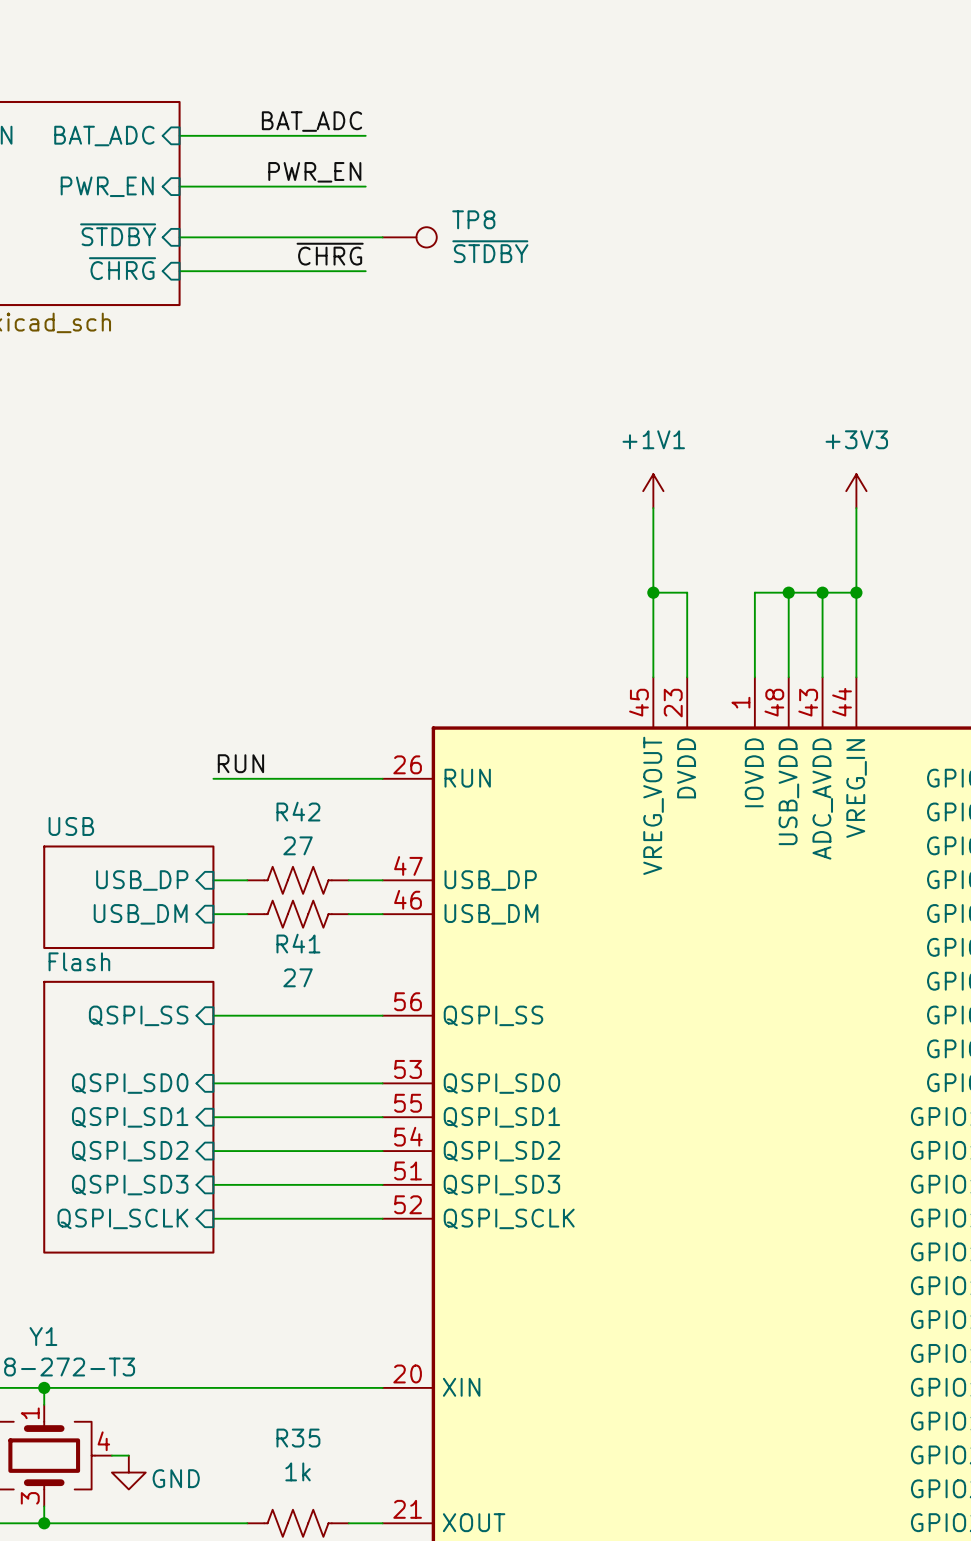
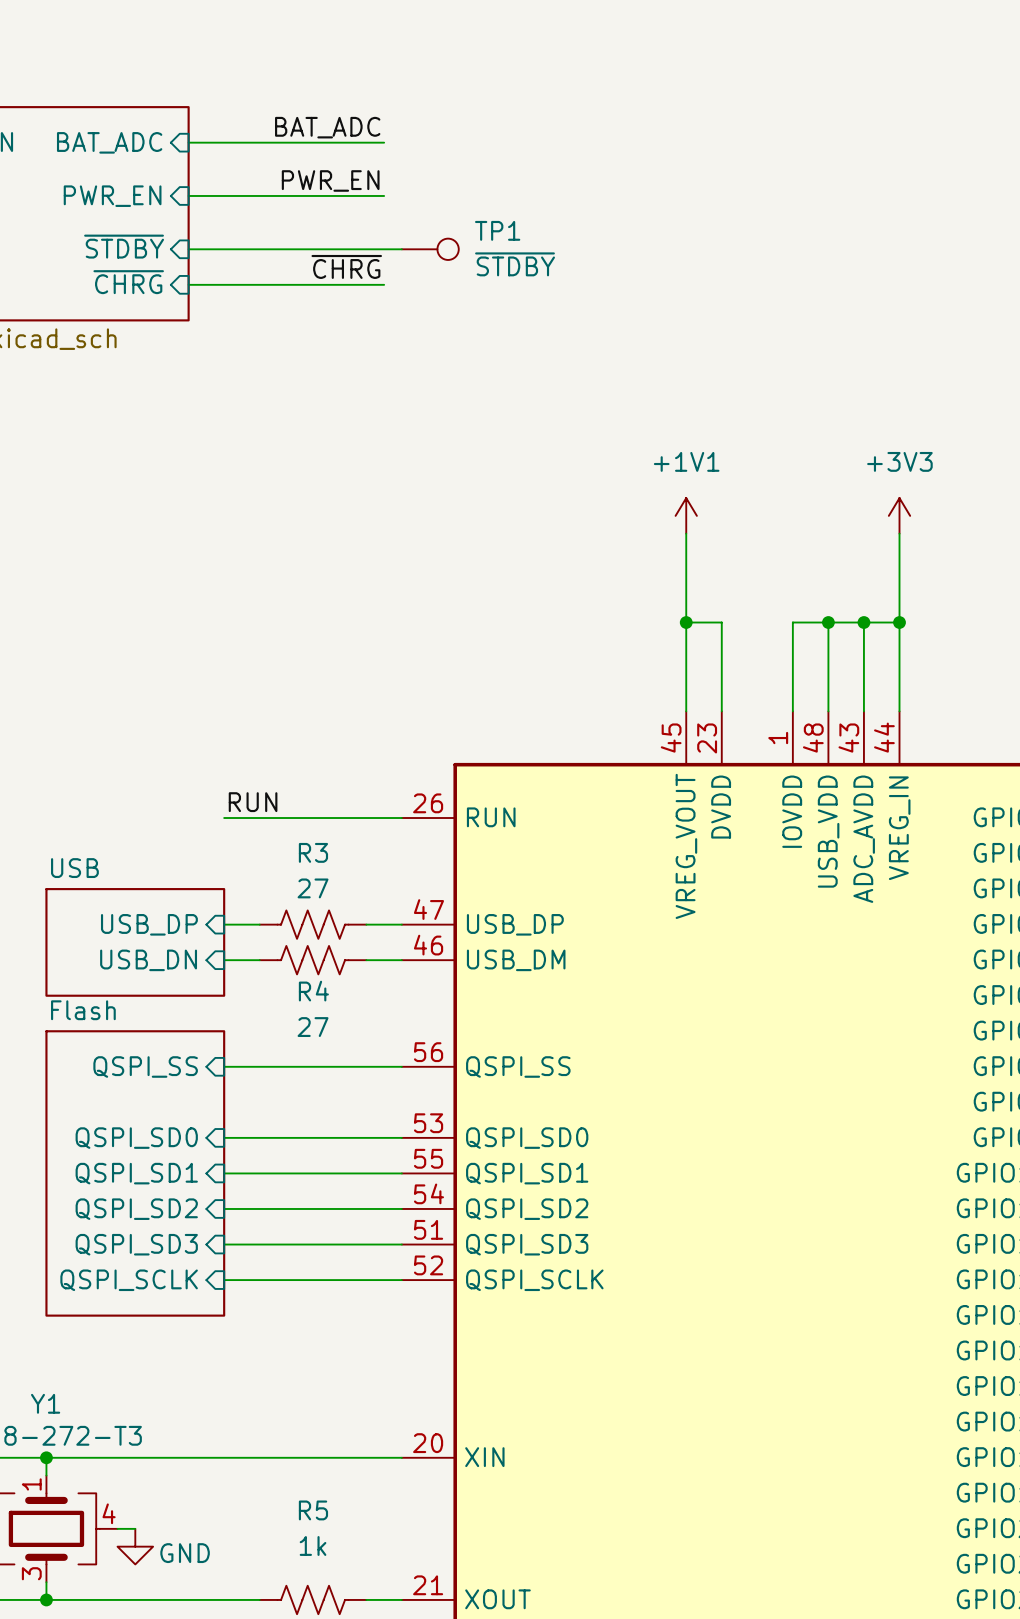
TP8 name: TP8 (473, 219) -> TP1 (497, 230)
R42 name: R42 (298, 811) -> R3 (313, 852)
sheet pin: USB_DM (140, 914) -> USB_DN (148, 960)
R41 name: R41 (298, 943) -> R4 (313, 991)
R35 name: R35 (298, 1438) -> R5 (313, 1510)

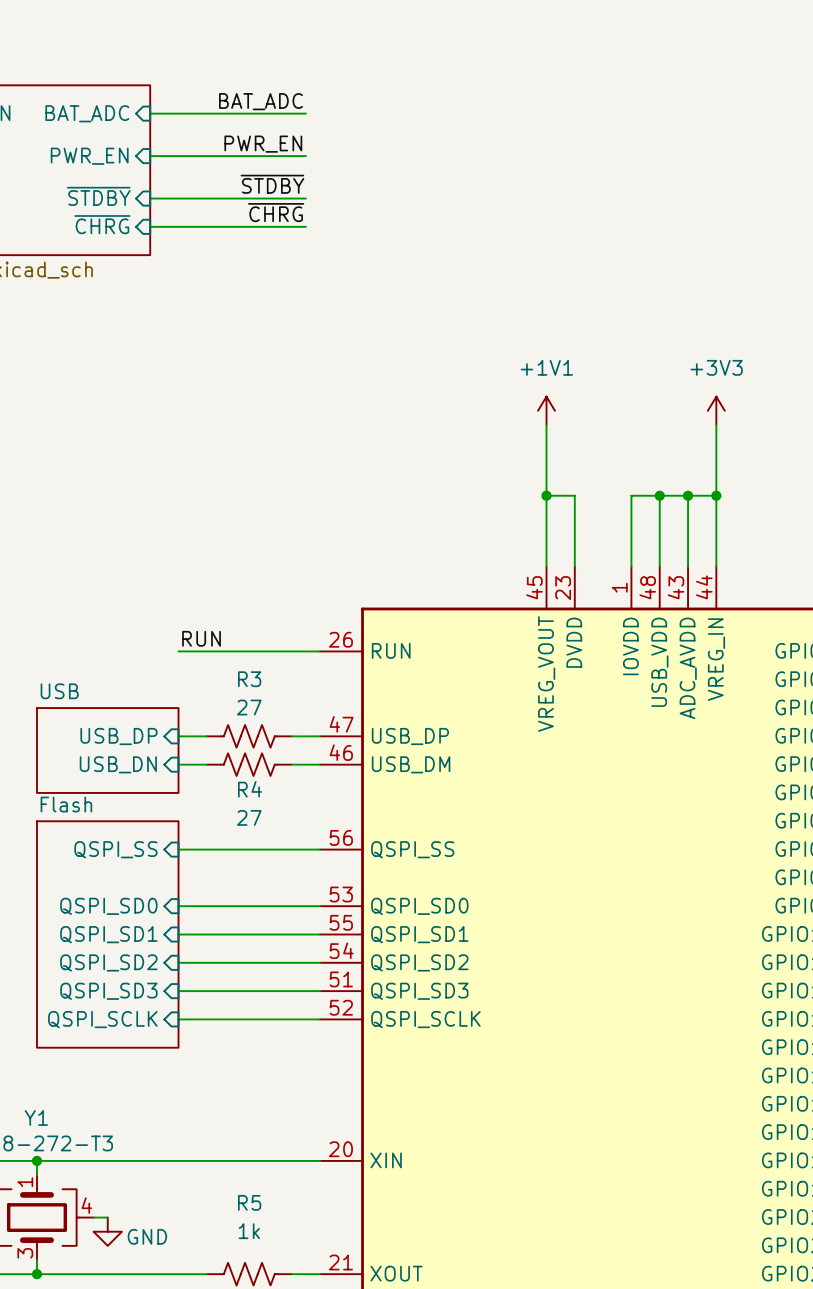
label: none -> ~{STDBY} (272, 184)
wire: (384, 249) (401, 249) -> none
TP1: ~{STDBY} (430, 249) -> none

